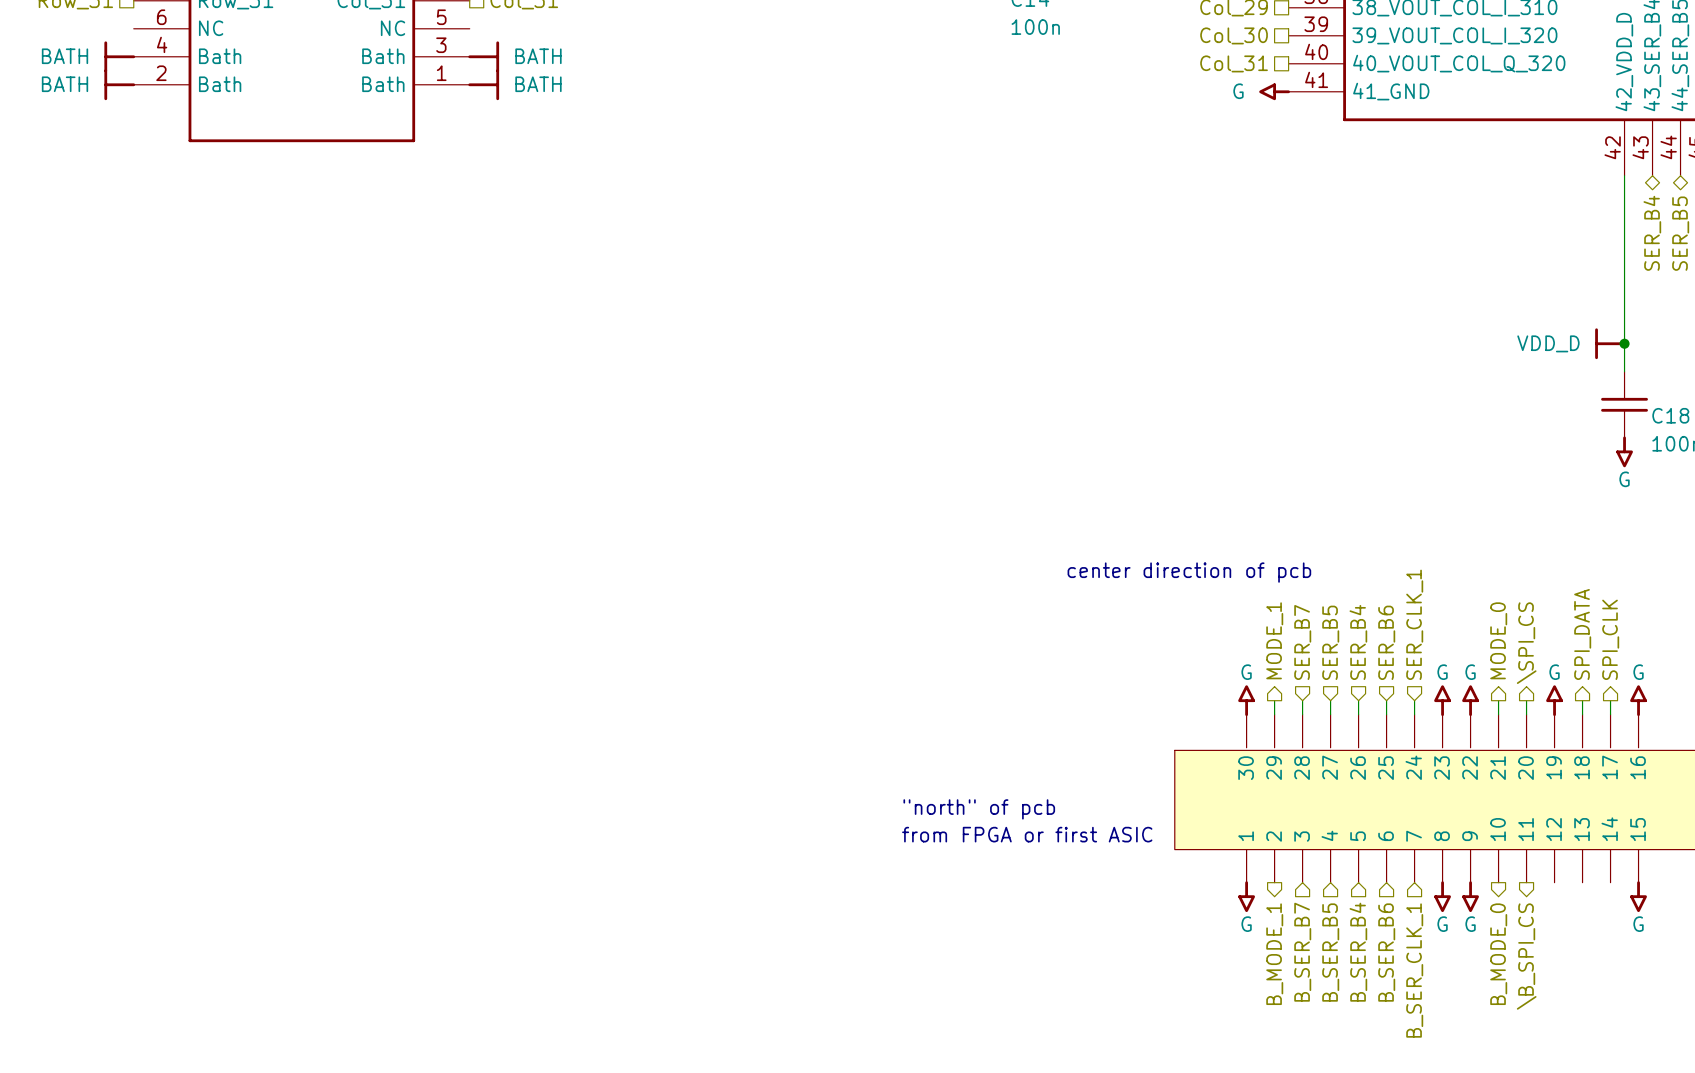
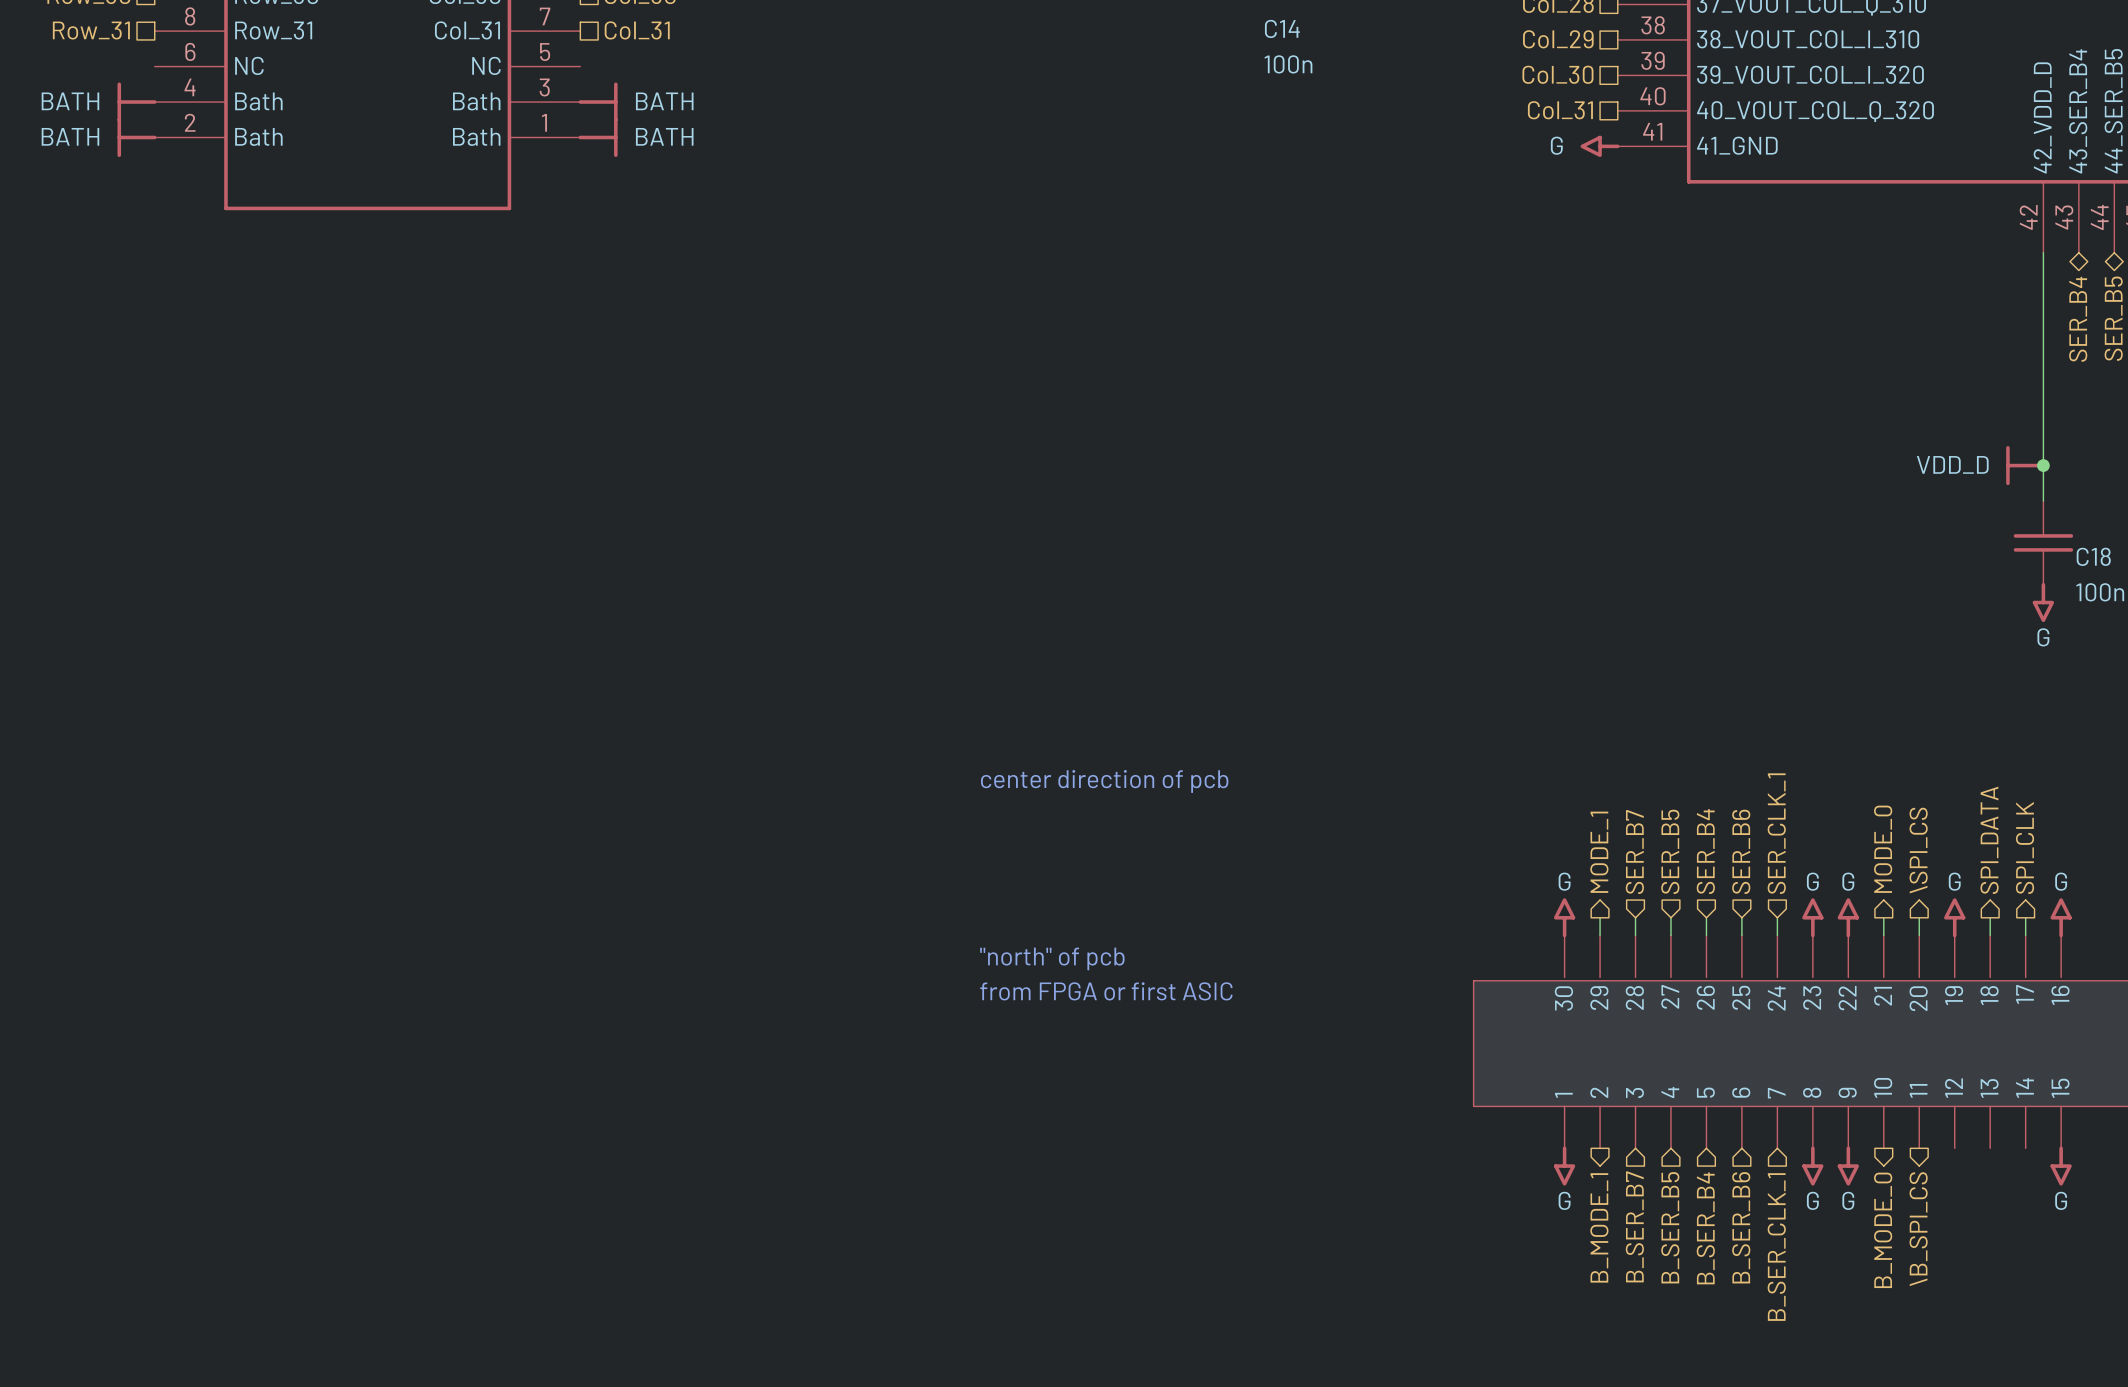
text: center direction of pcb (1189, 572) -> none
text: none -> center direction of pcb (1104, 781)
text position: "north" of pcb (979, 809) -> "north" of pcb (1052, 958)
text position: from FPGA or first ASIC (1027, 834) -> from FPGA or first ASIC (1106, 991)

